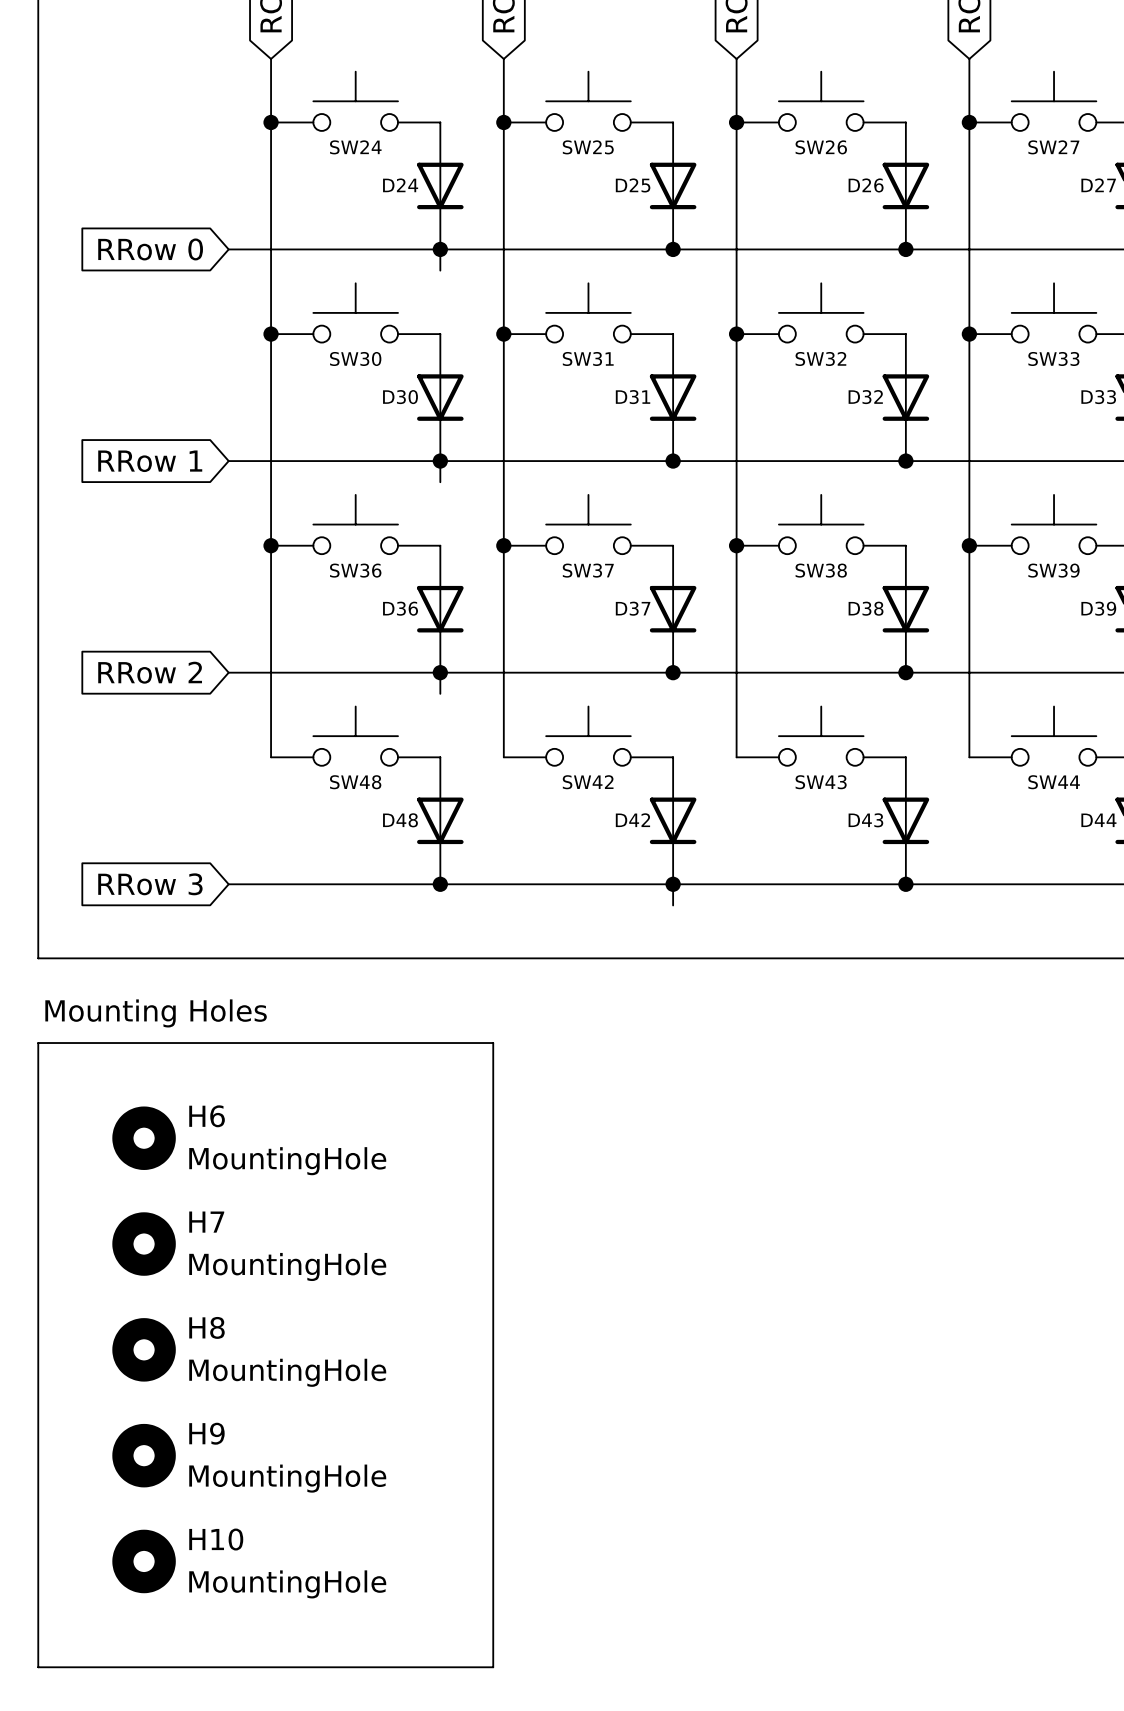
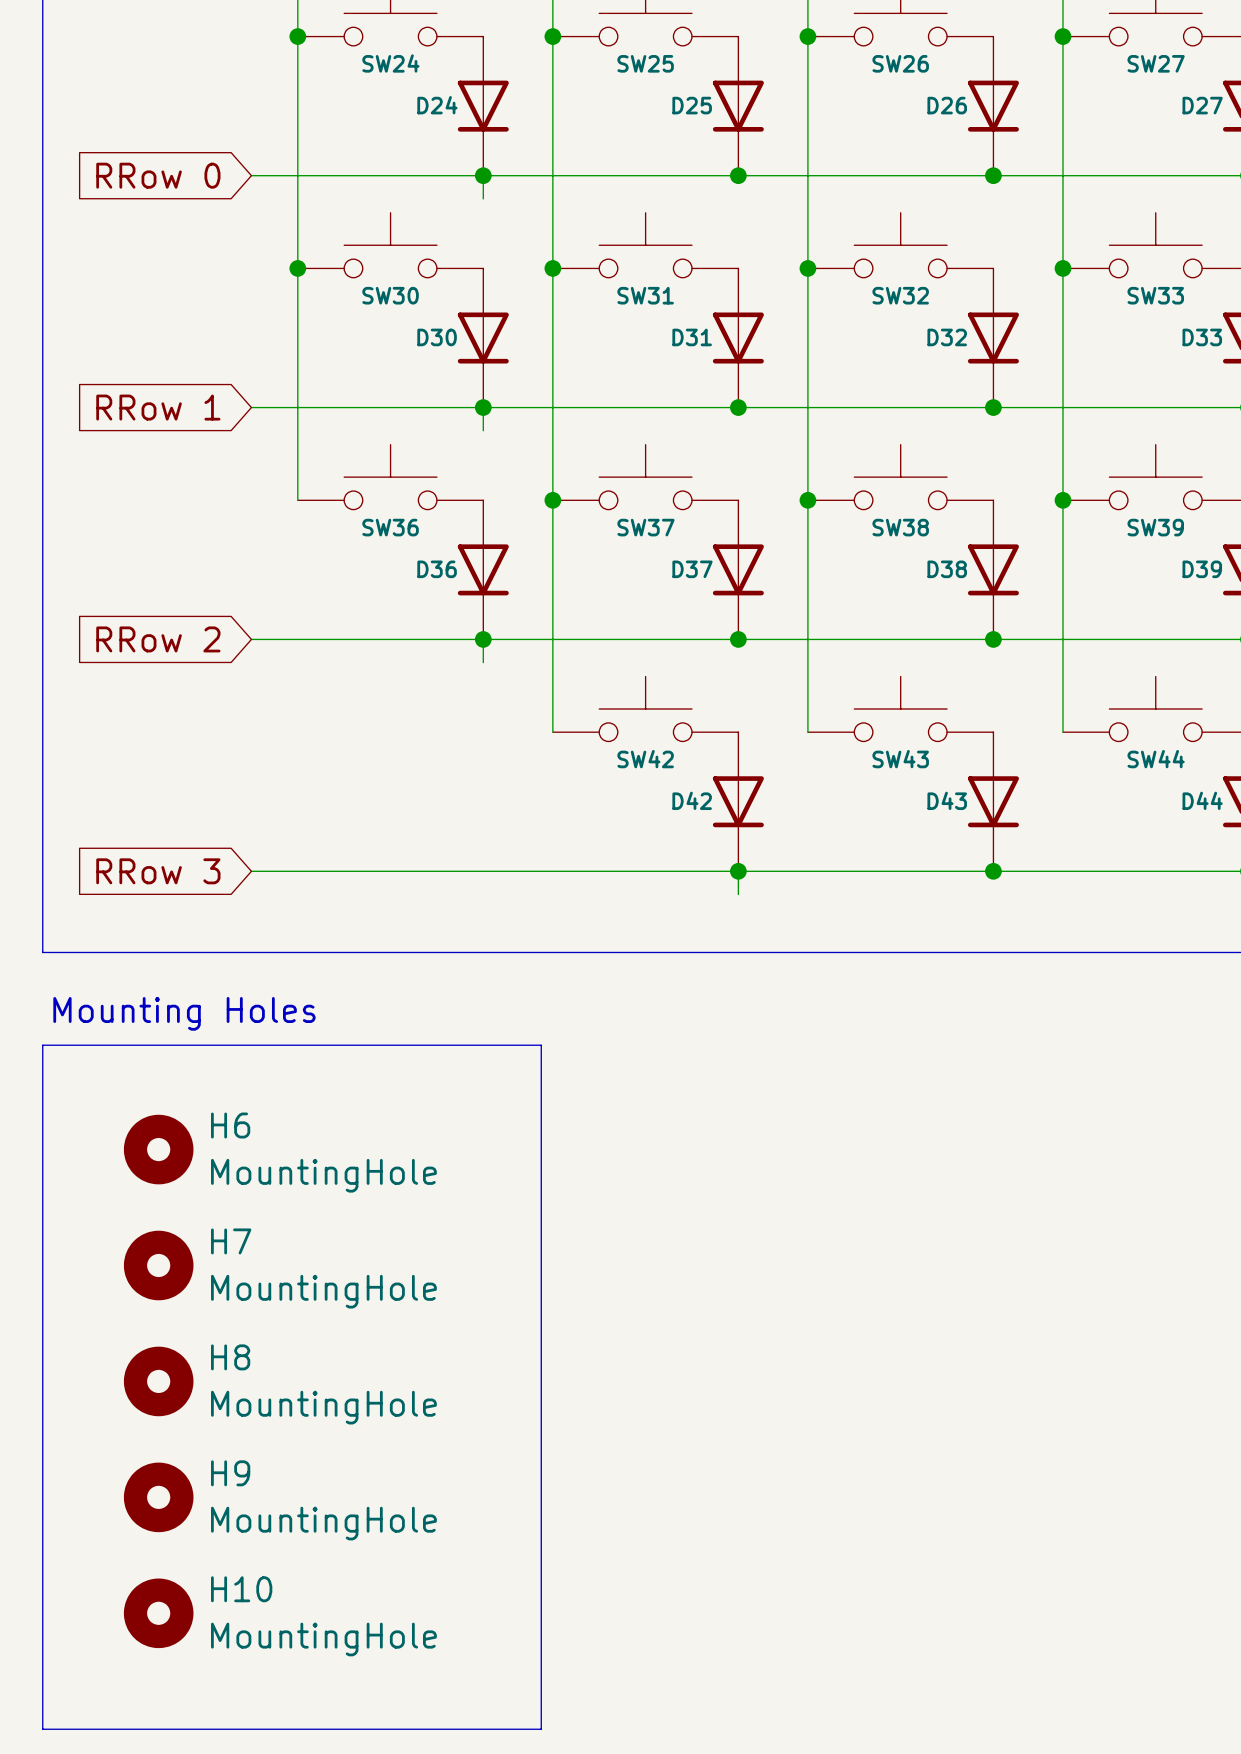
wire: (271, 545) (271, 757) -> none
junction: (271, 545) -> none
SW48: (355, 736) -> none
D48: (440, 820) -> none
junction: (440, 884) -> none

